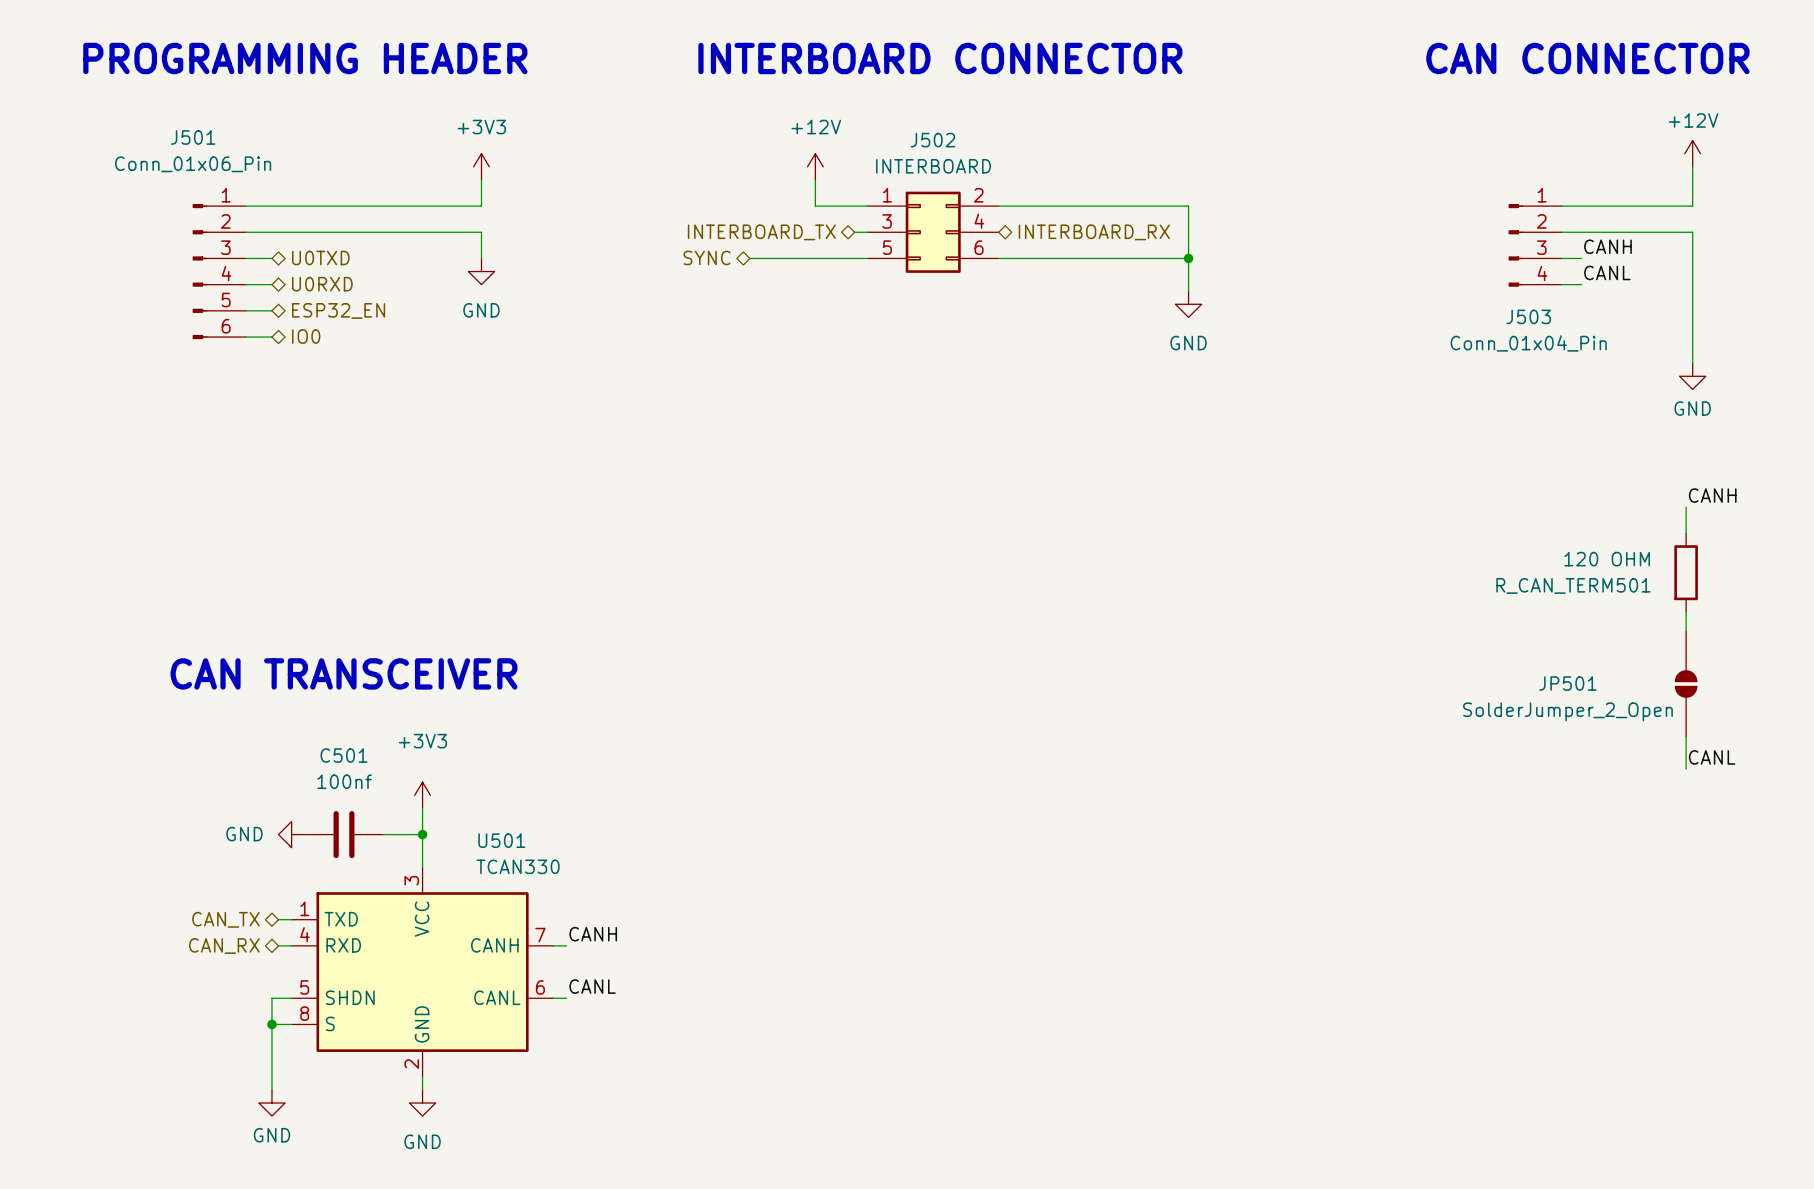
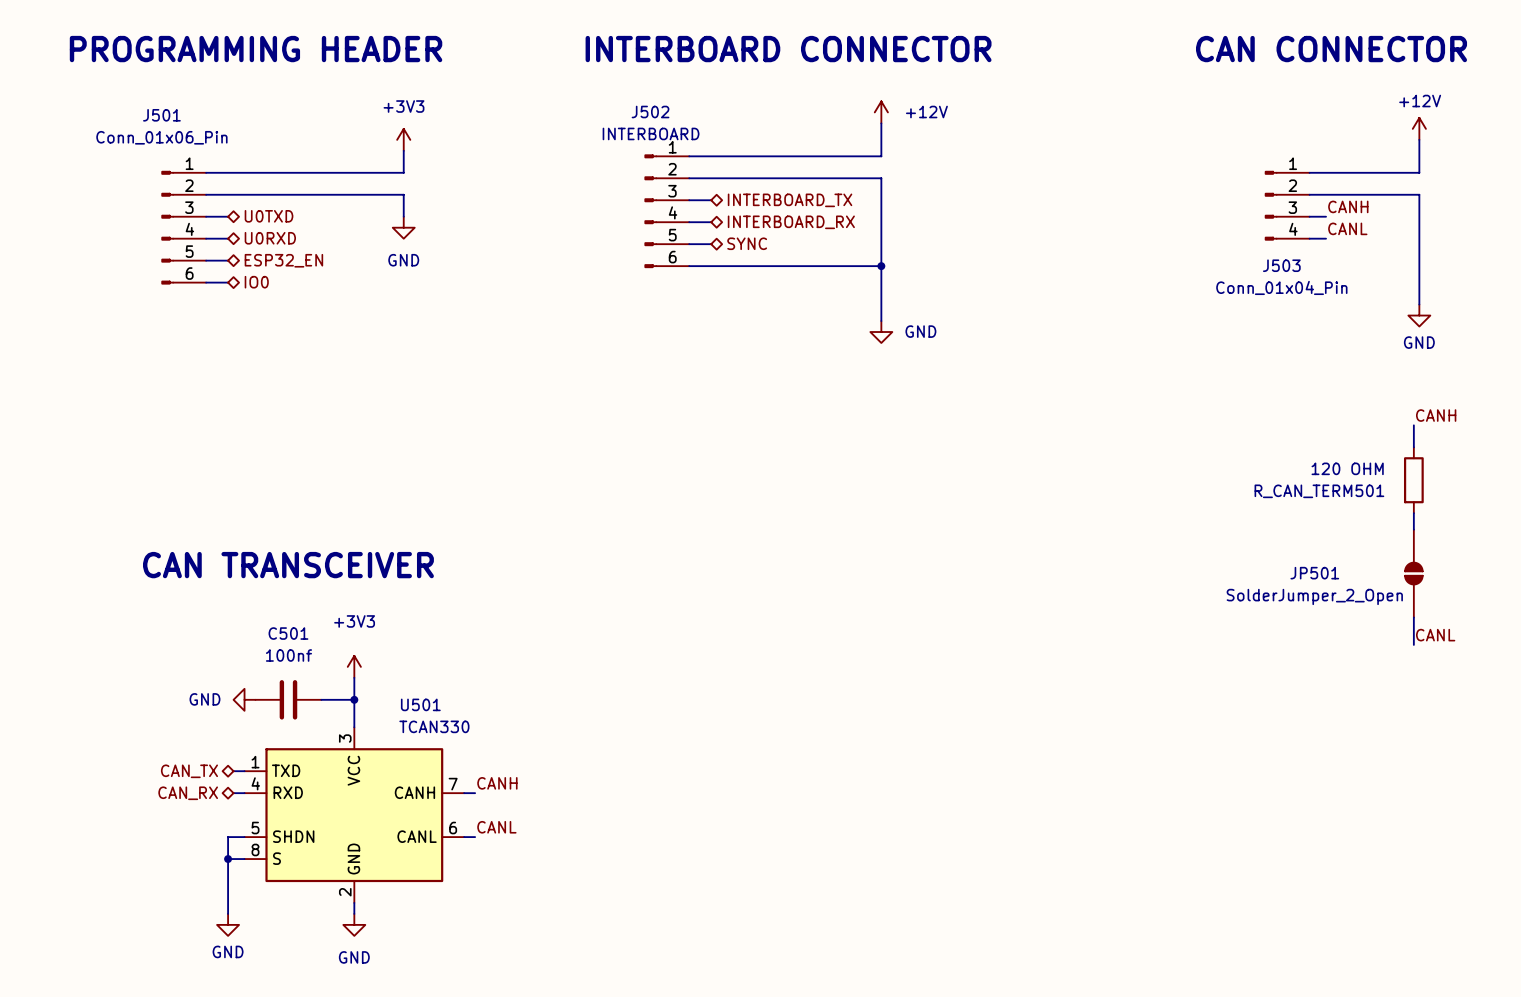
power symbol text position: +12V (816, 127) -> +12V (926, 112)
J502 name position: J502 (932, 140) -> J502 (650, 112)
wire: none -> (881, 123) (881, 156) (689, 156)
power symbol position: +12V (815, 166) -> +12V (881, 112)
J502 value position: INTERBOARD (933, 166) -> INTERBOARD (651, 133)
wire: (815, 179) (815, 206) (867, 206) -> none
J502 symbol: [867, 191, 999, 273] -> [644, 154, 690, 268]
wire: (998, 206) (1188, 206) (1188, 291) -> none
wire: none -> (689, 178) (881, 178) (881, 321)
hierarchical label rotation: 0° (761, 232) -> 180° (790, 200)
hierarchical label position: INTERBOARD_TX (761, 232) -> INTERBOARD_TX (790, 200)
wire: (854, 232) (867, 232) -> none
hierarchical label position: INTERBOARD_RX (1094, 232) -> INTERBOARD_RX (791, 222)
wire: none -> (689, 200) (711, 200)
hierarchical label rotation: 0° (706, 257) -> 180° (747, 243)
hierarchical label position: SYNC (706, 257) -> SYNC (747, 243)
wire: (749, 258) (867, 258) -> none
wire: (998, 258) (1188, 258) -> none
junction: (1188, 258) -> none
wire: none -> (689, 222) (711, 222)
wire: none -> (689, 244) (711, 244)
power symbol position: GND (1188, 304) -> GND (881, 332)
wire: none -> (689, 266) (881, 266)
junction: none -> (881, 266)
power symbol text position: GND (1188, 343) -> GND (920, 331)

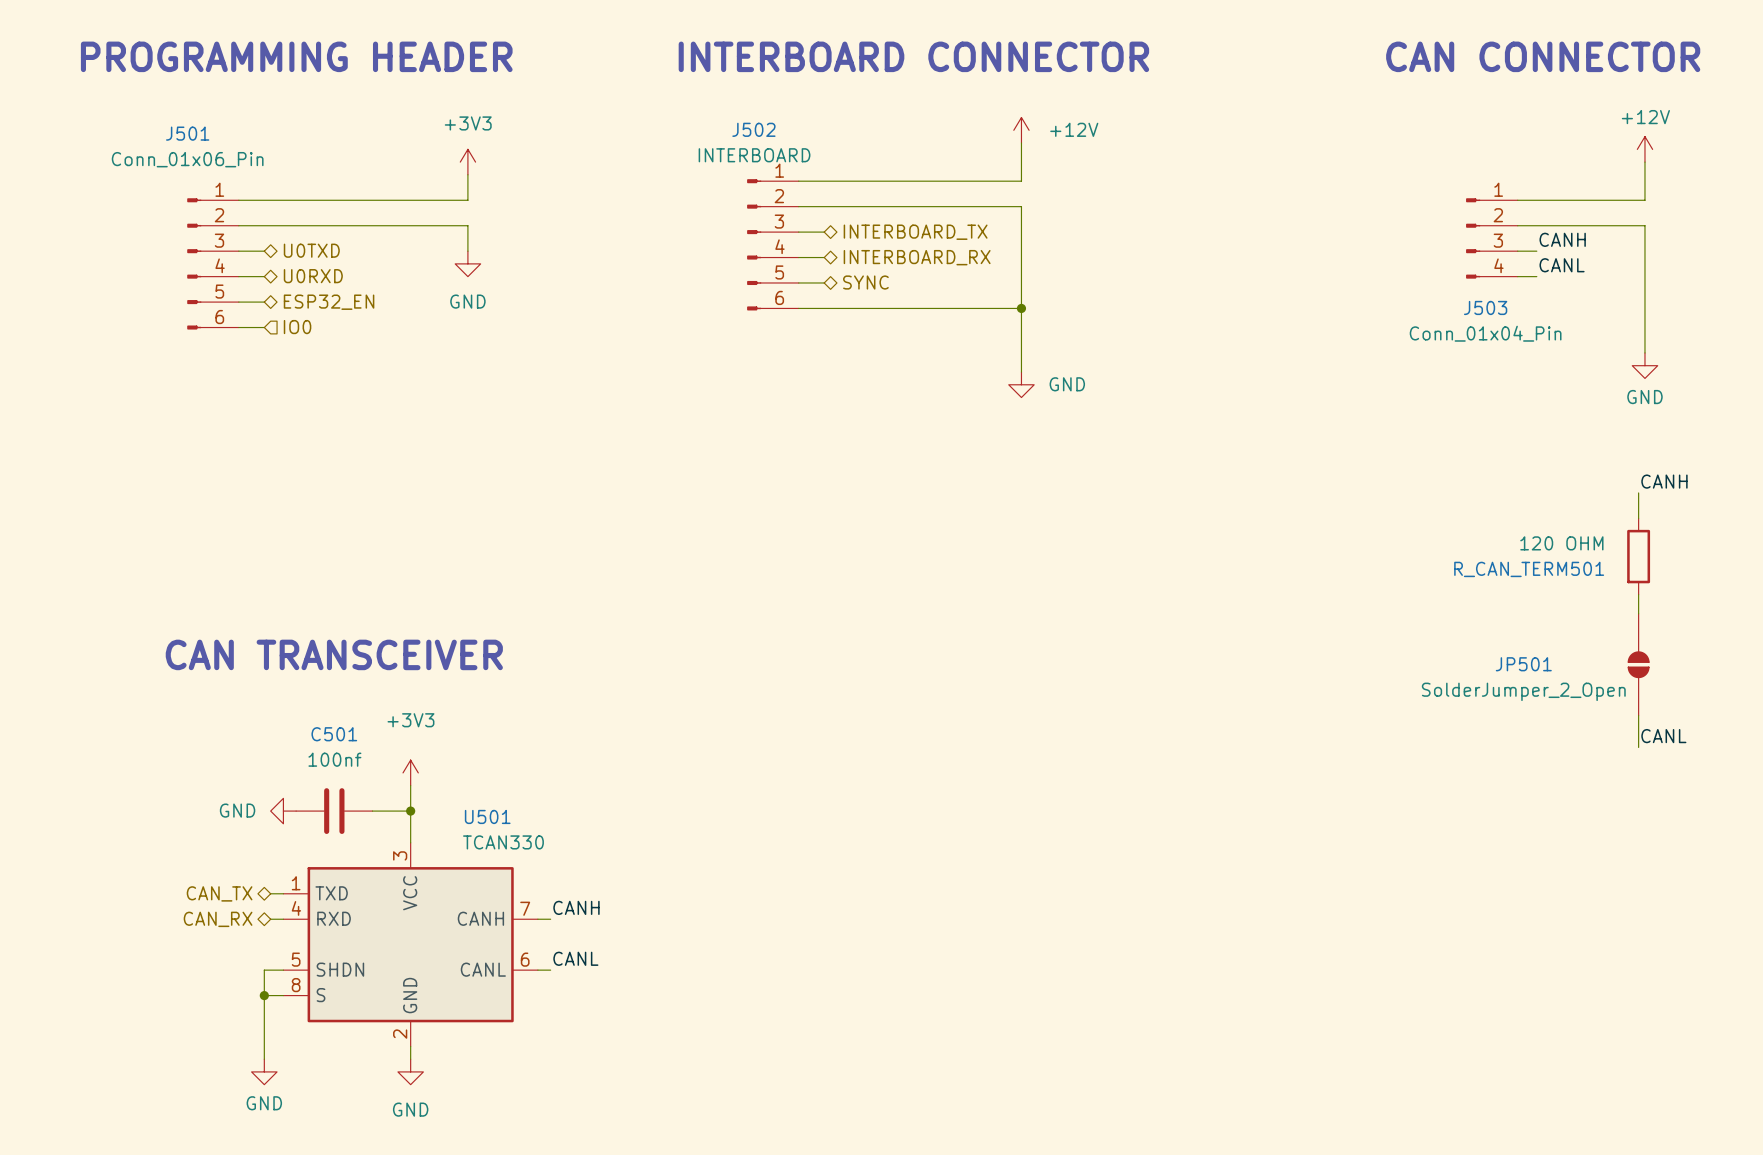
hierarchical label shape: bidirectional (256, 282) -> input (297, 327)

